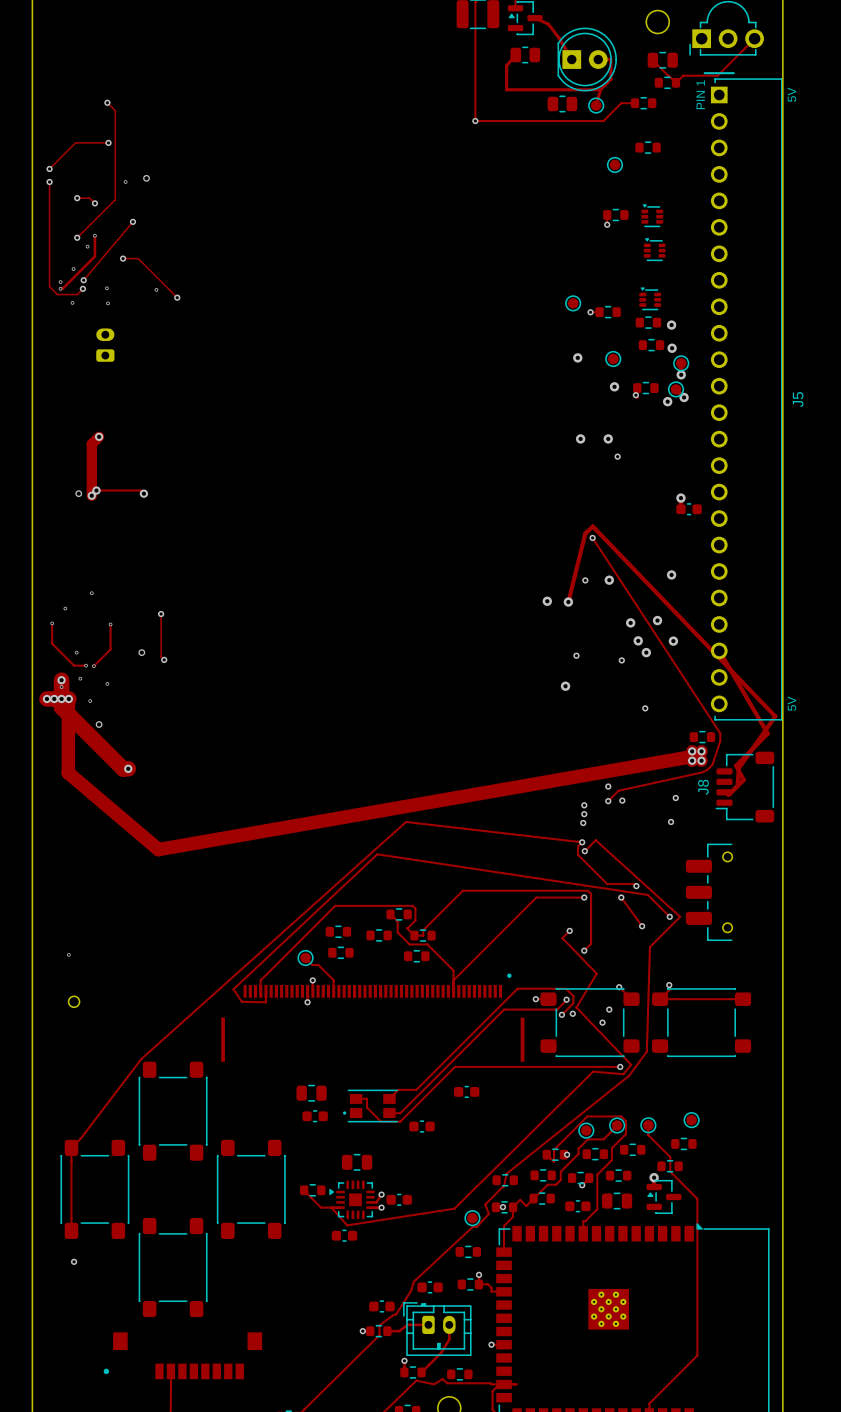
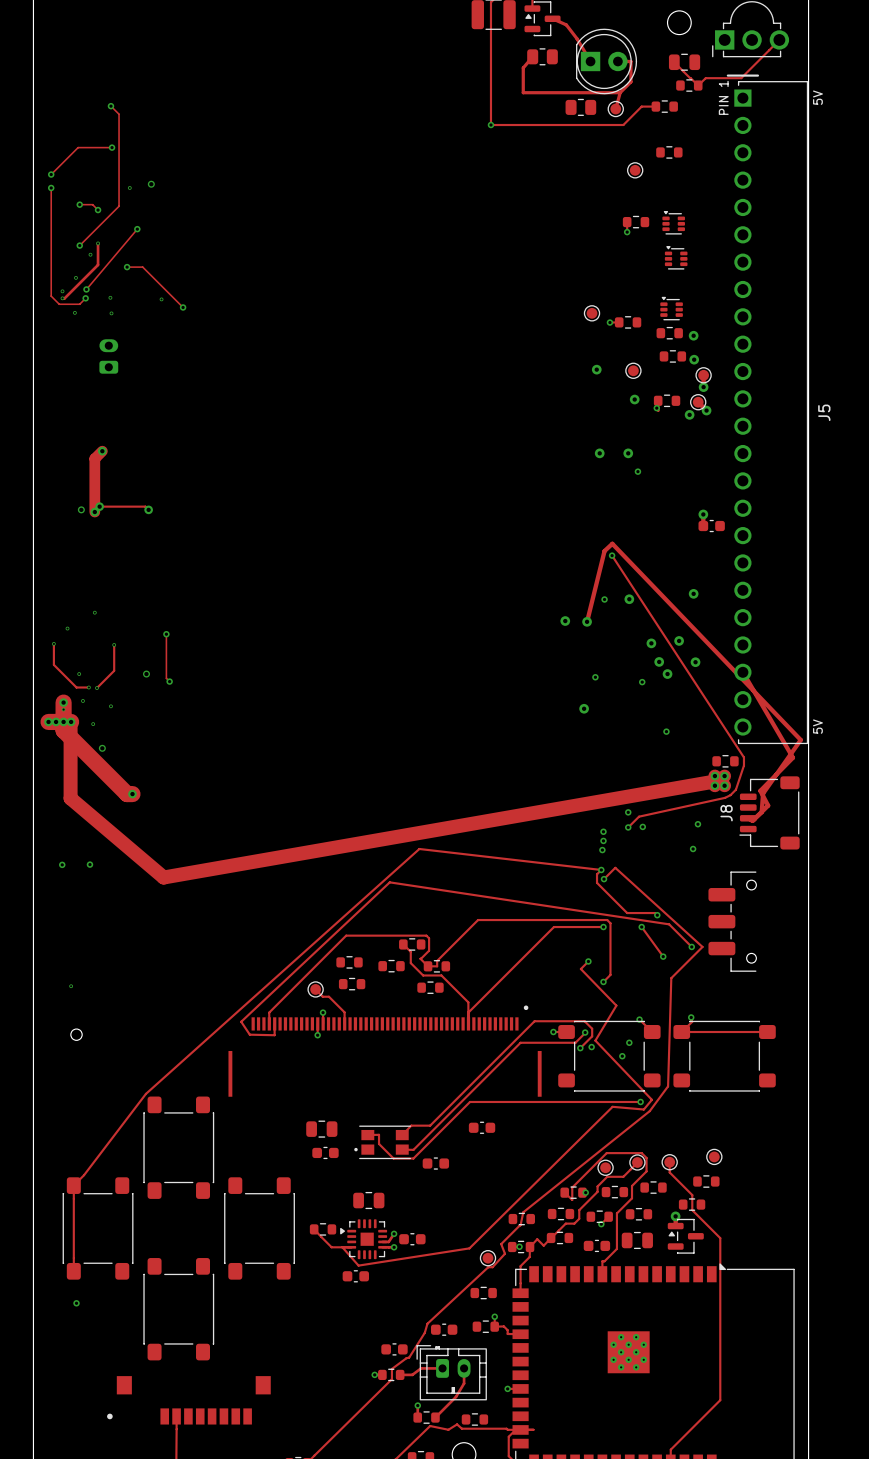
via: none -> (62, 864)
via: none -> (89, 864)

